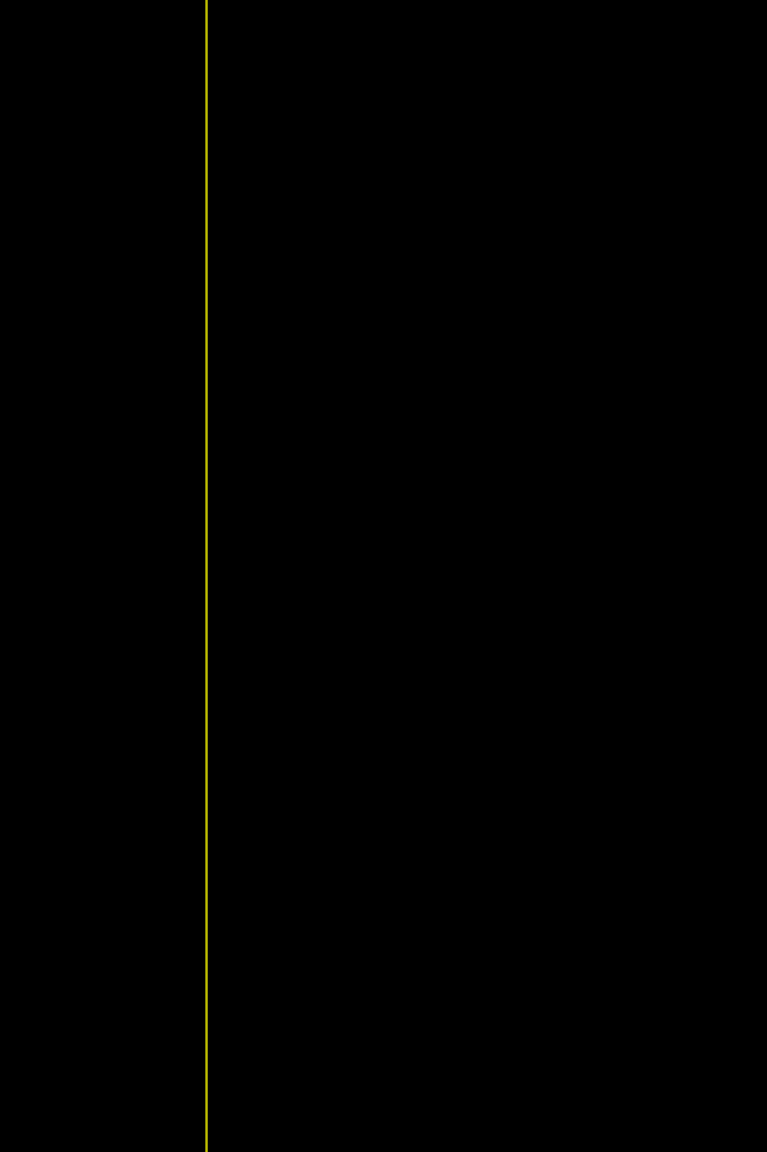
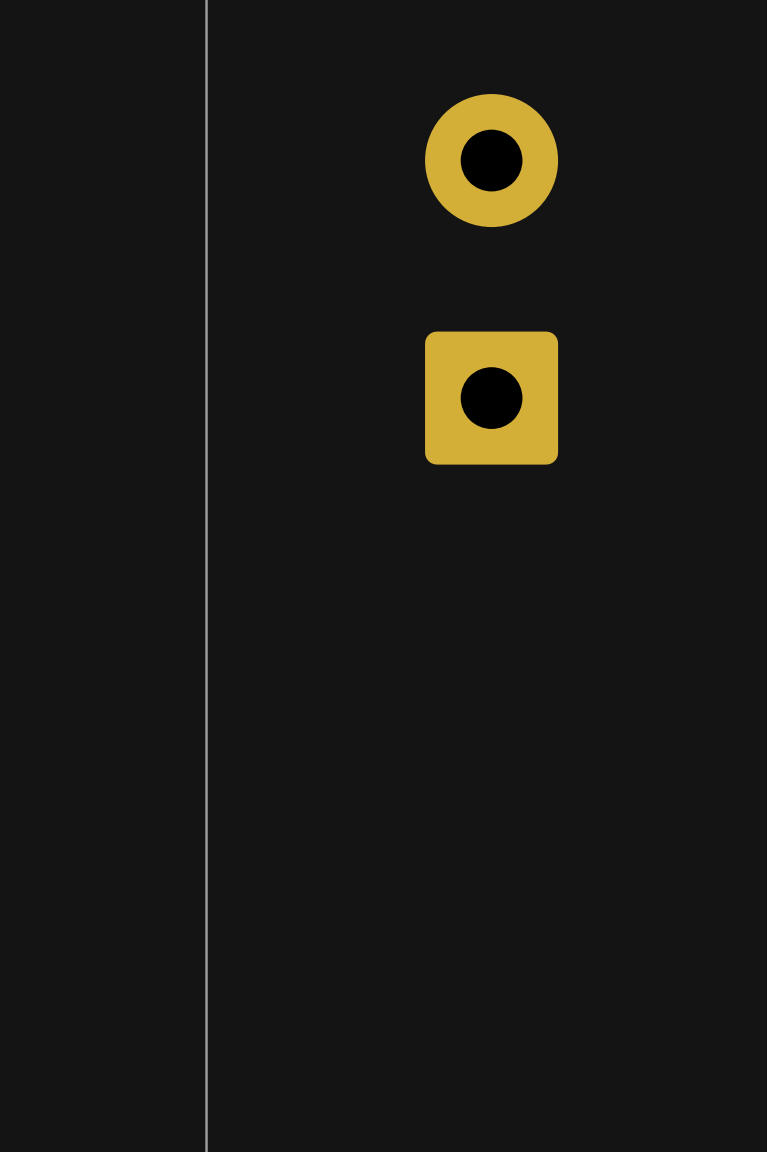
part: none -> (491, 279)

